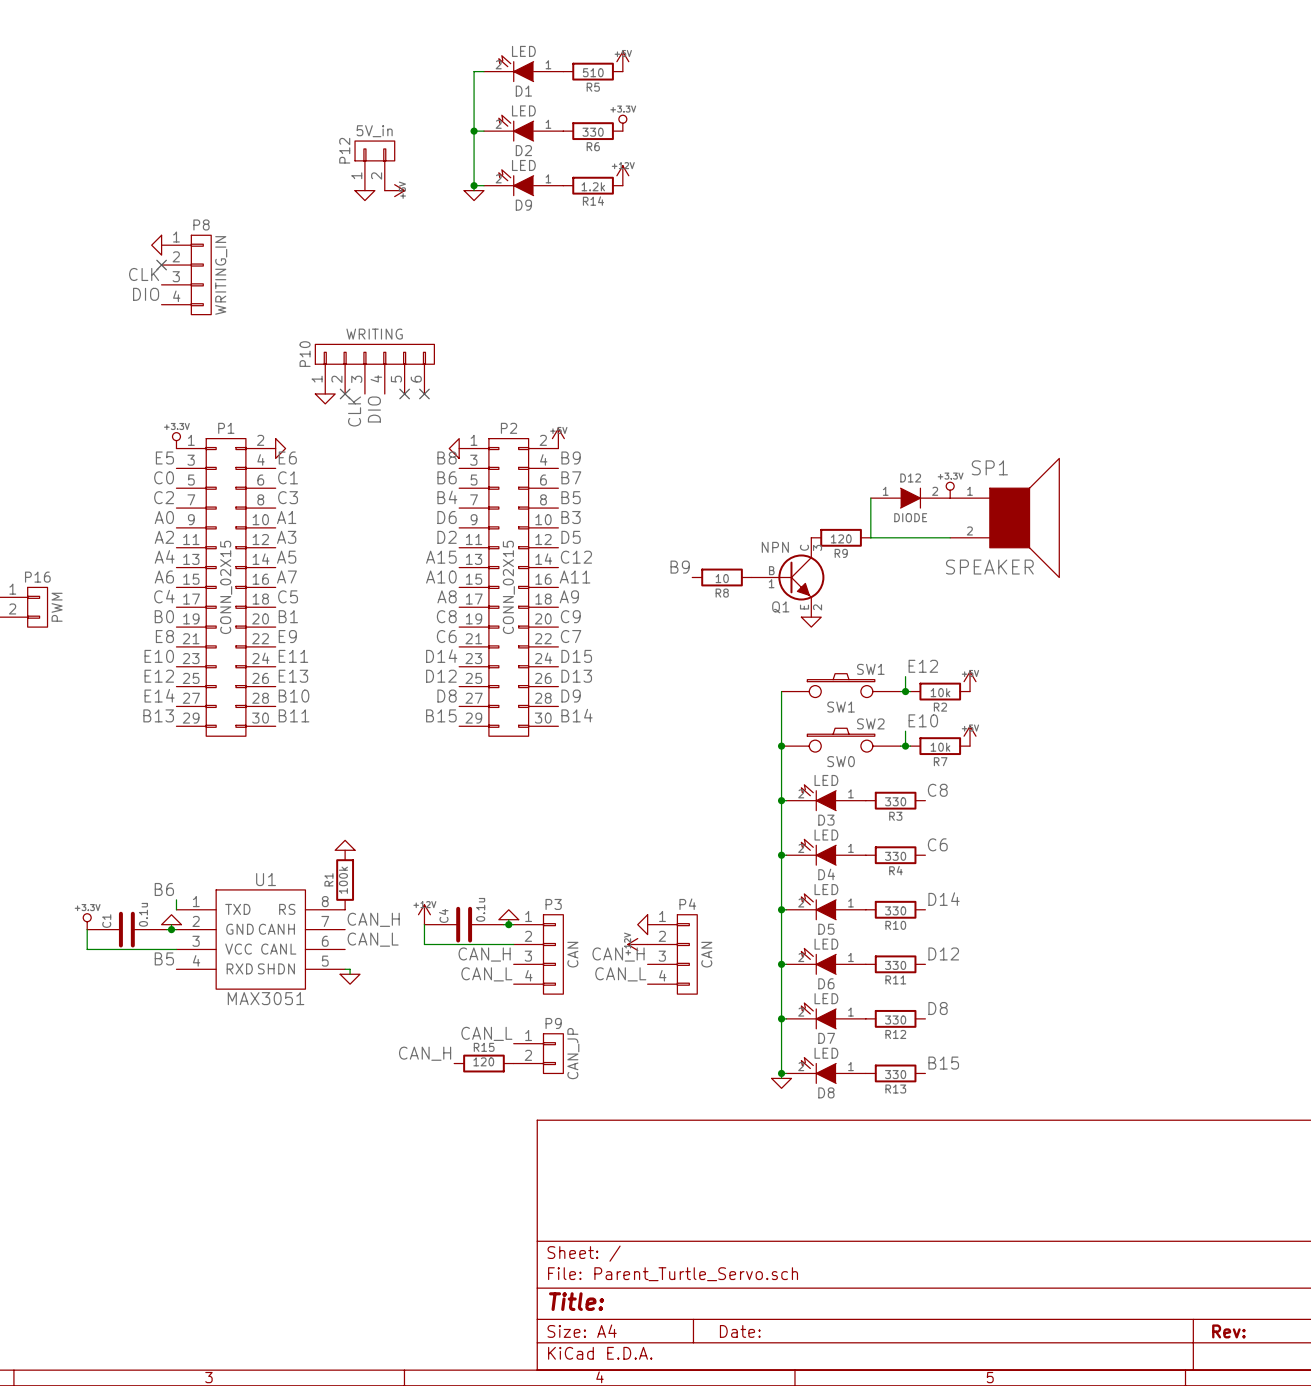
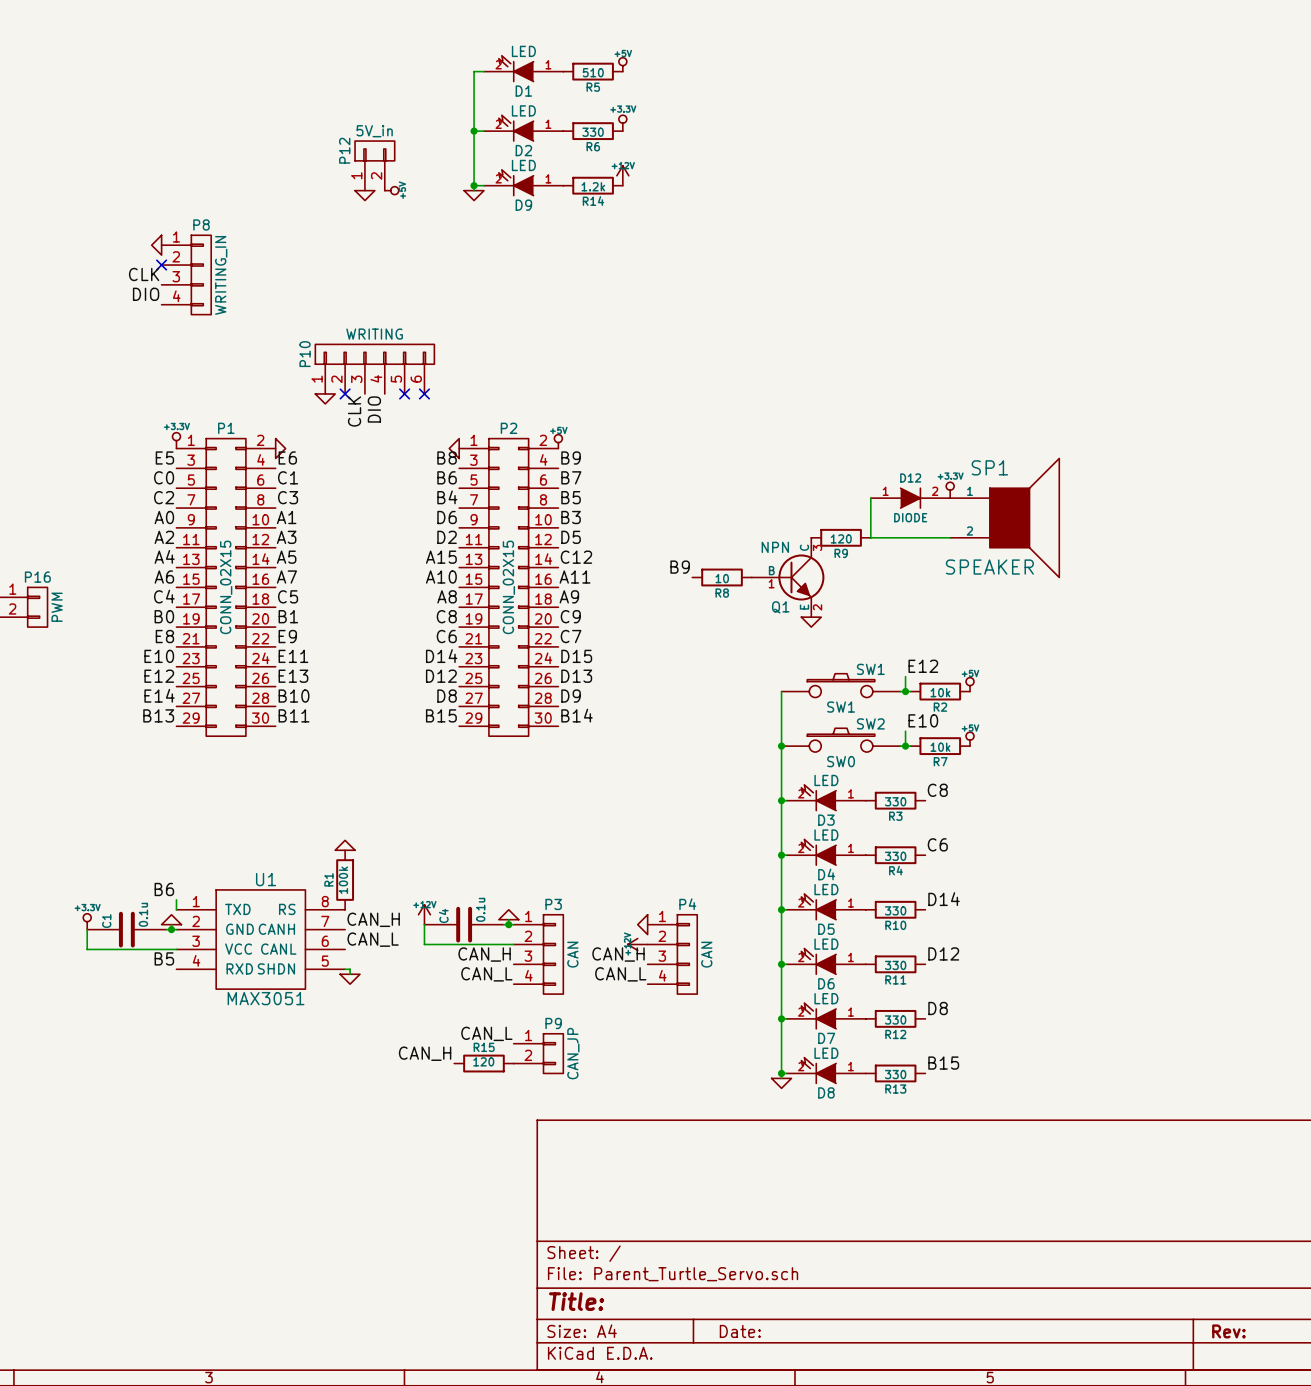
power symbol shape: [616, 51, 629, 72] -> [618, 57, 627, 72]
power symbol shape: [384, 184, 405, 197] -> [384, 186, 399, 195]
power symbol shape: [552, 428, 565, 449] -> [554, 434, 563, 449]
power symbol shape: [964, 671, 976, 692] -> [966, 677, 974, 692]
power symbol shape: [964, 726, 976, 747] -> [966, 732, 974, 747]

